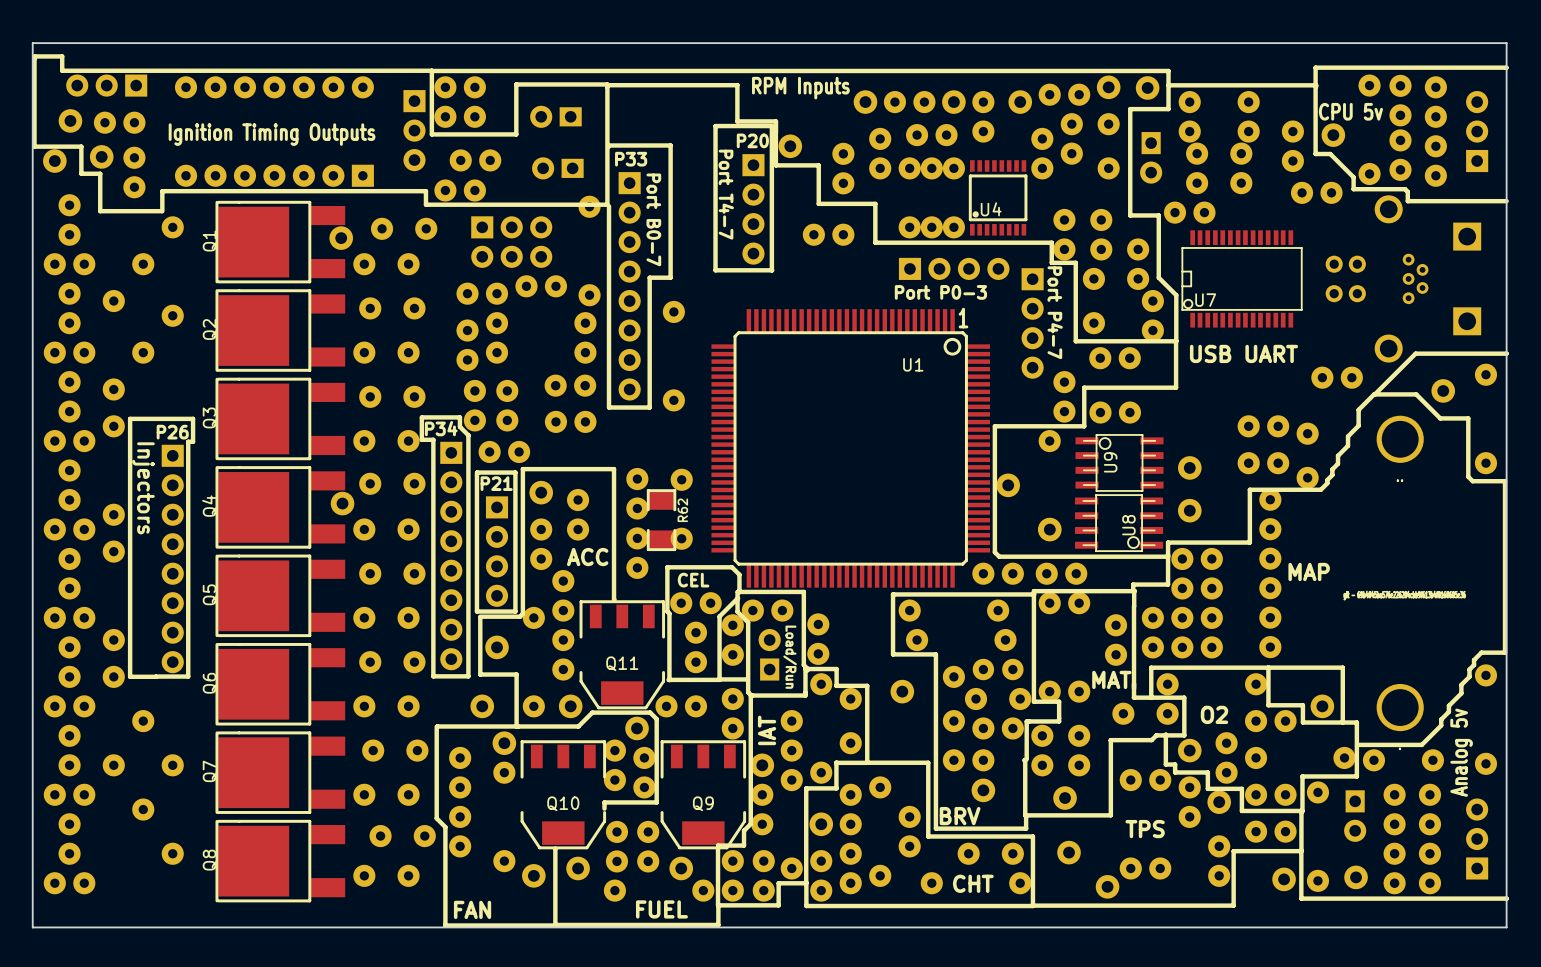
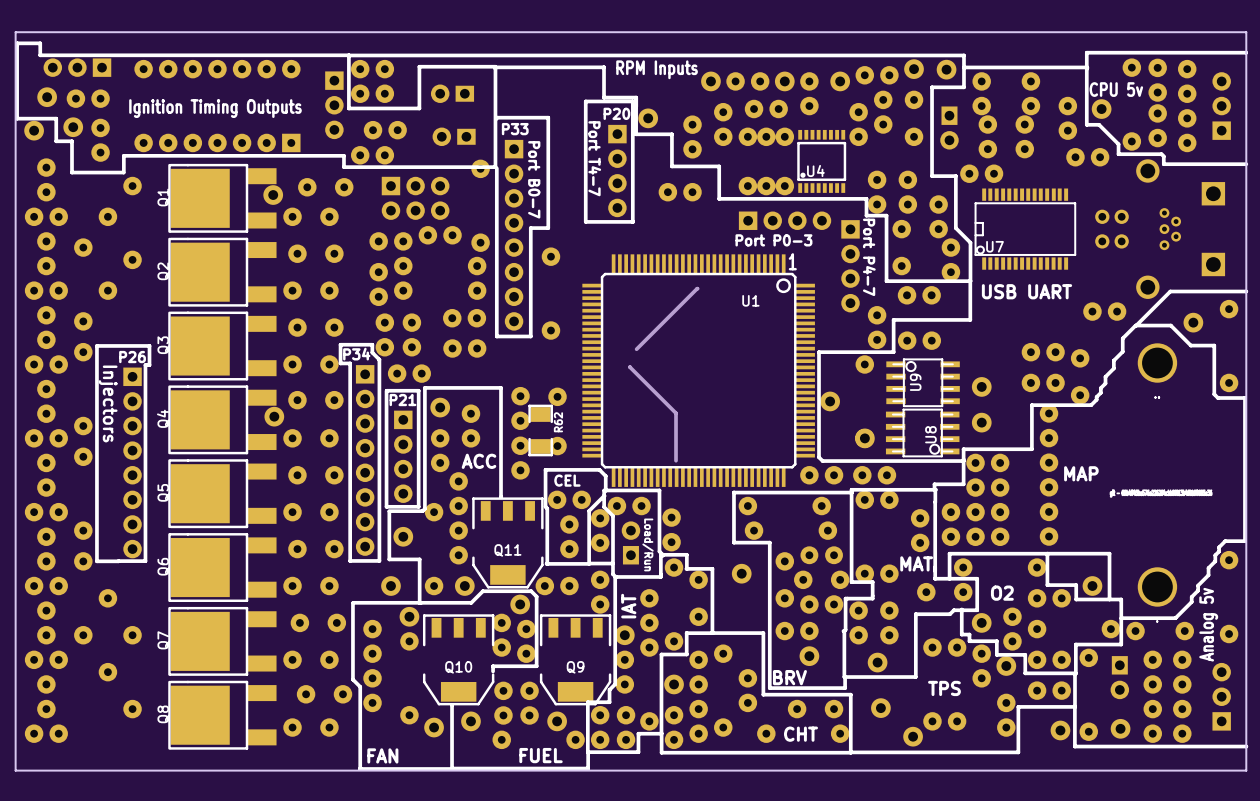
line: none -> (697, 288) (636, 349)
line: none -> (629, 366) (676, 413) (676, 460)

